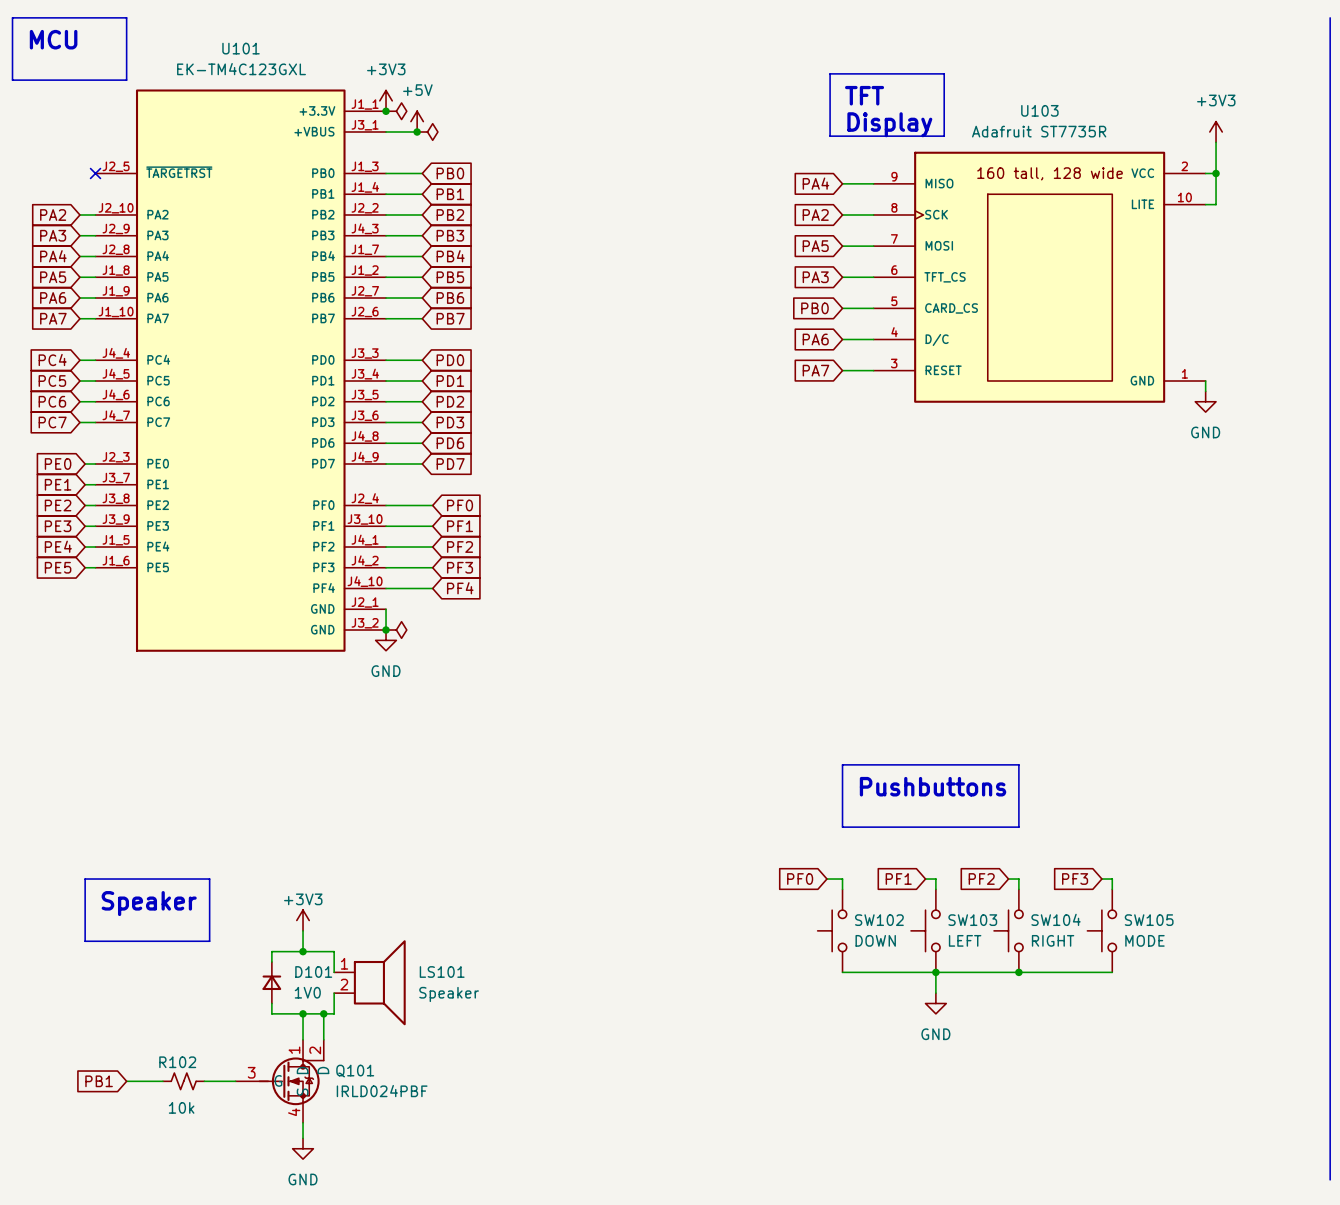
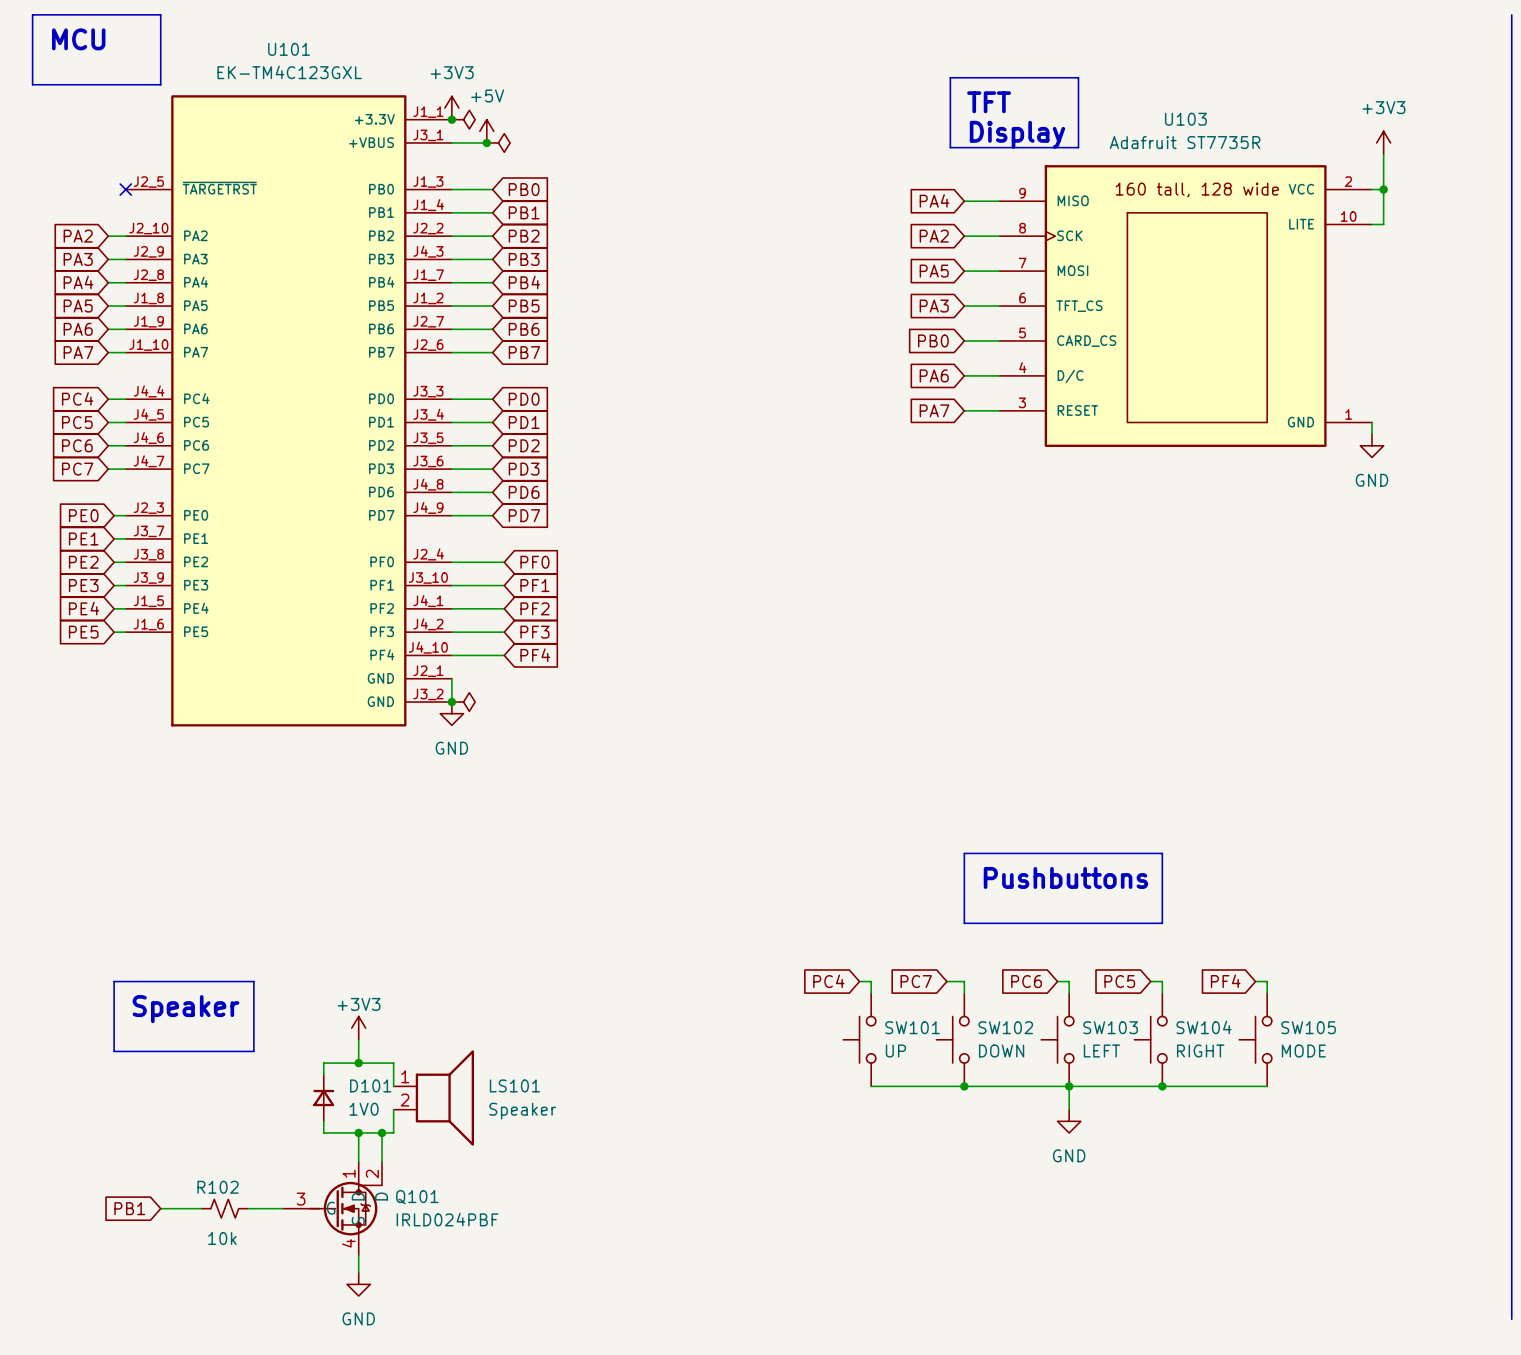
global label: none -> PC4 (828, 981)
wire: none -> (859, 981) (871, 981) (871, 993)
global label: PF0 (800, 879) -> PC7 (916, 981)
global label: PF1 (898, 879) -> PC6 (1026, 981)
global label: PF2 (981, 879) -> PC5 (1119, 981)
global label: PF3 (1075, 879) -> PF4 (1225, 981)
SW101: none -> UP (859, 1039)
wire: none -> (871, 1086) (964, 1086)
junction: none -> (964, 1086)

